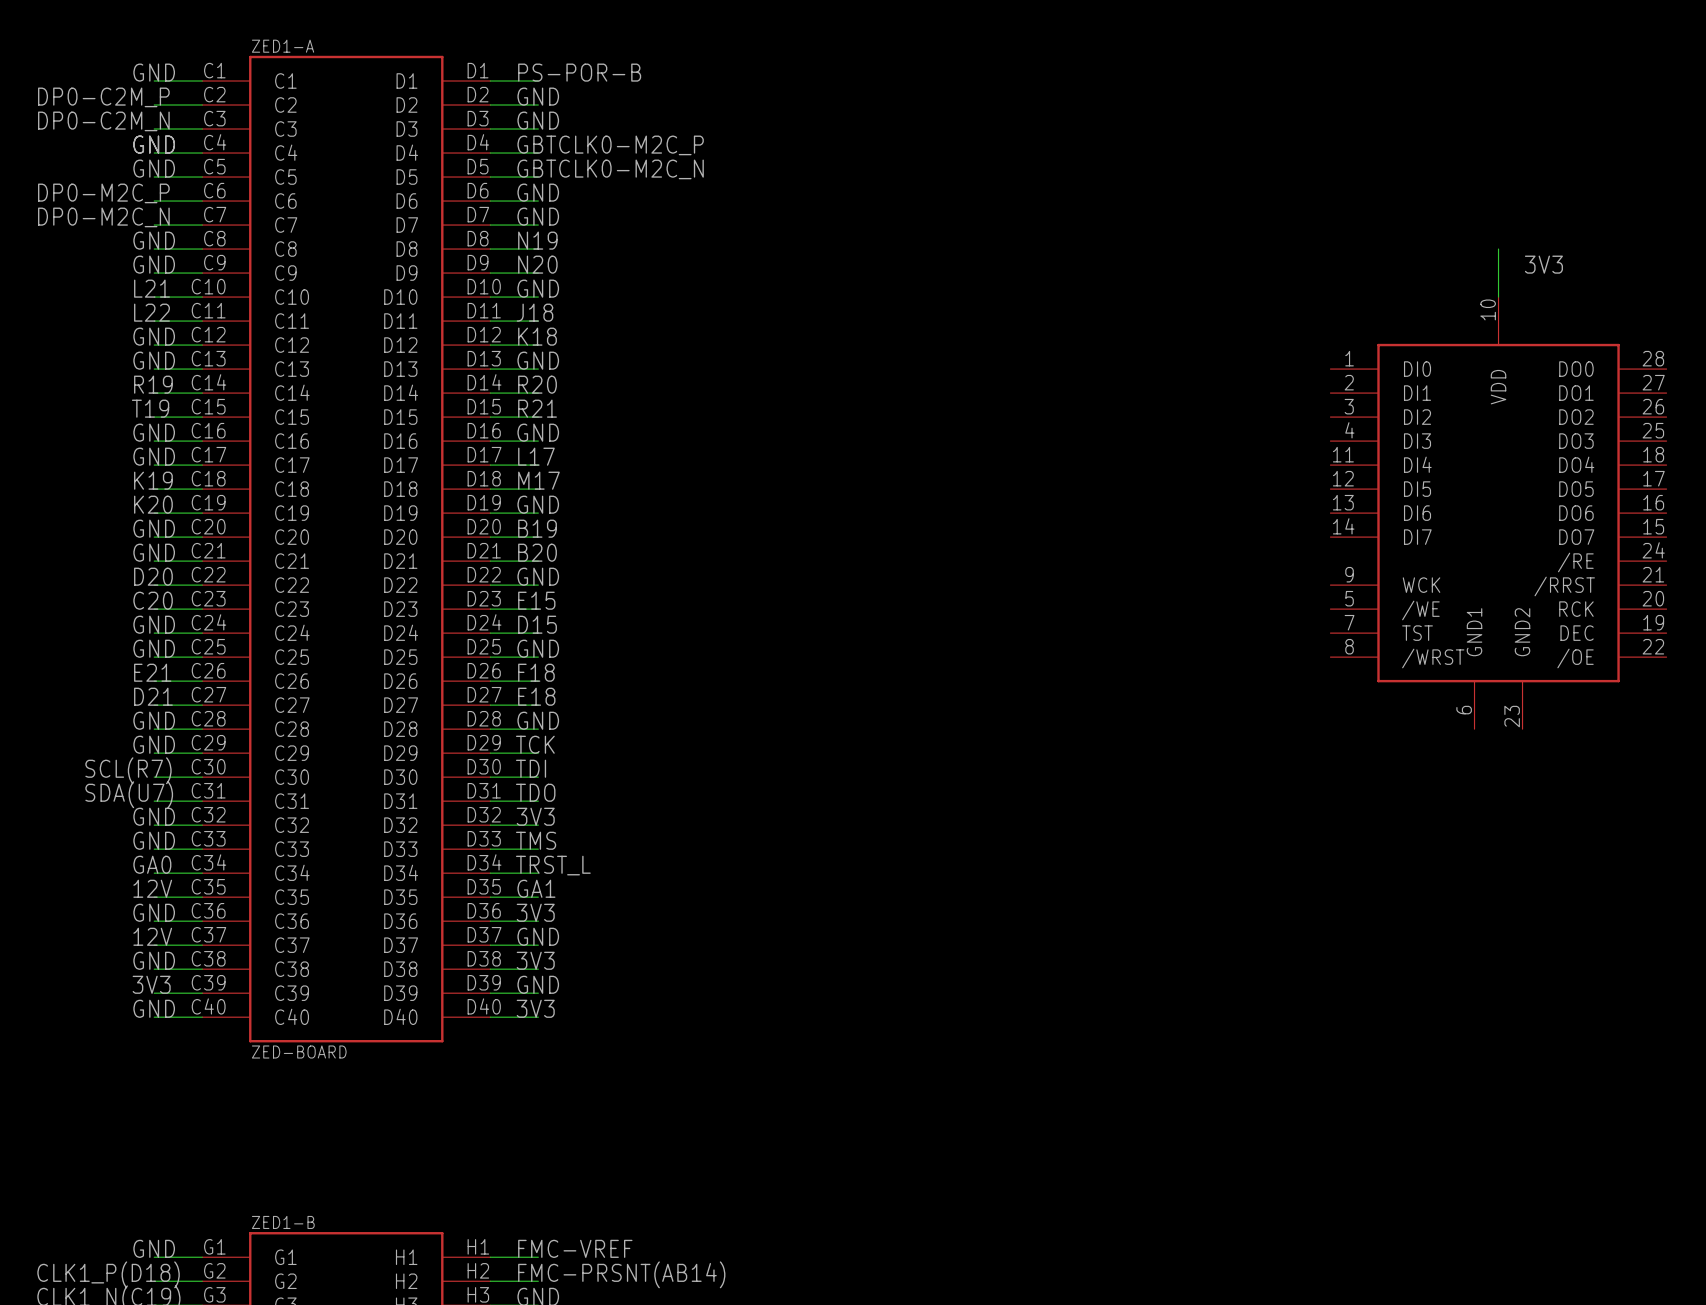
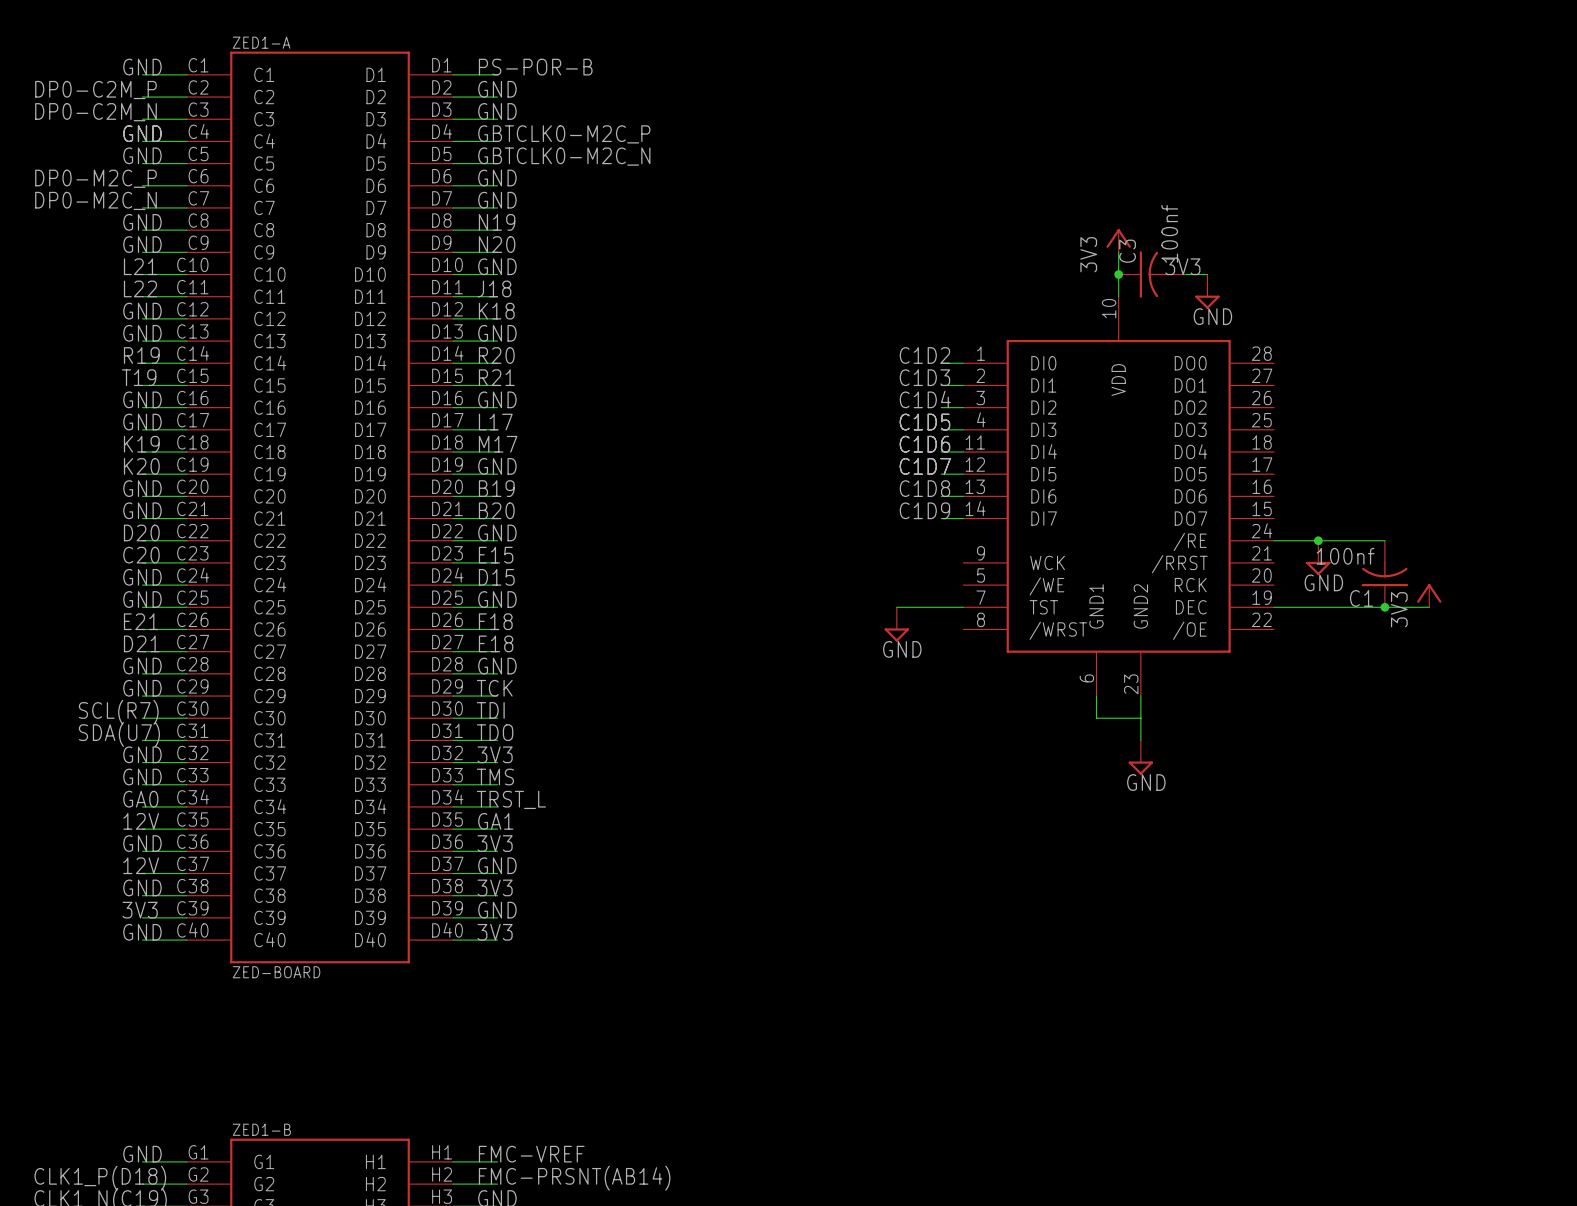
wire: (1498, 249) (1498, 297) -> none
power symbol: none -> 3V3 (1118, 240)
label: 3V3 (1543, 264) -> none
wire: none -> (1118, 252) (1118, 296)
label: none -> 3V3 (1182, 266)
junction: none -> (1118, 274)
C3: none -> 100nf (1151, 274)
wire: none -> (1185, 274) (1207, 274)
power symbol: none -> GND (1207, 291)
label: none -> C1D2 (924, 355)
wire: none -> (941, 363) (963, 363)
label: none -> C1D3 (924, 377)
wire: none -> (941, 385) (963, 385)
label: none -> C1D4 (925, 399)
wire: none -> (941, 407) (963, 407)
label: none -> C1D5 (924, 422)
wire: none -> (941, 429) (963, 429)
label: none -> C1D6 (924, 444)
wire: none -> (941, 452) (963, 452)
label: none -> C1D7 (925, 466)
wire: none -> (941, 474) (963, 474)
part: (1498, 513) -> none
label: none -> C1D8 (924, 488)
wire: none -> (941, 496) (963, 496)
part: none -> (1118, 496)
label: none -> C1D9 (924, 510)
wire: none -> (941, 518) (963, 518)
wire: none -> (1273, 540) (1384, 540)
junction: none -> (1318, 540)
power symbol: none -> GND (1318, 557)
C1: none -> 100nf (1384, 574)
power symbol: none -> 3V3 (1429, 595)
wire: none -> (896, 607) (963, 607)
wire: none -> (1273, 607) (1429, 607)
junction: none -> (1384, 607)
power symbol: none -> GND (896, 624)
wire: none -> (1096, 696) (1096, 718) (1140, 718)
wire: none -> (1140, 696) (1140, 740)
power symbol: none -> GND (1140, 757)

